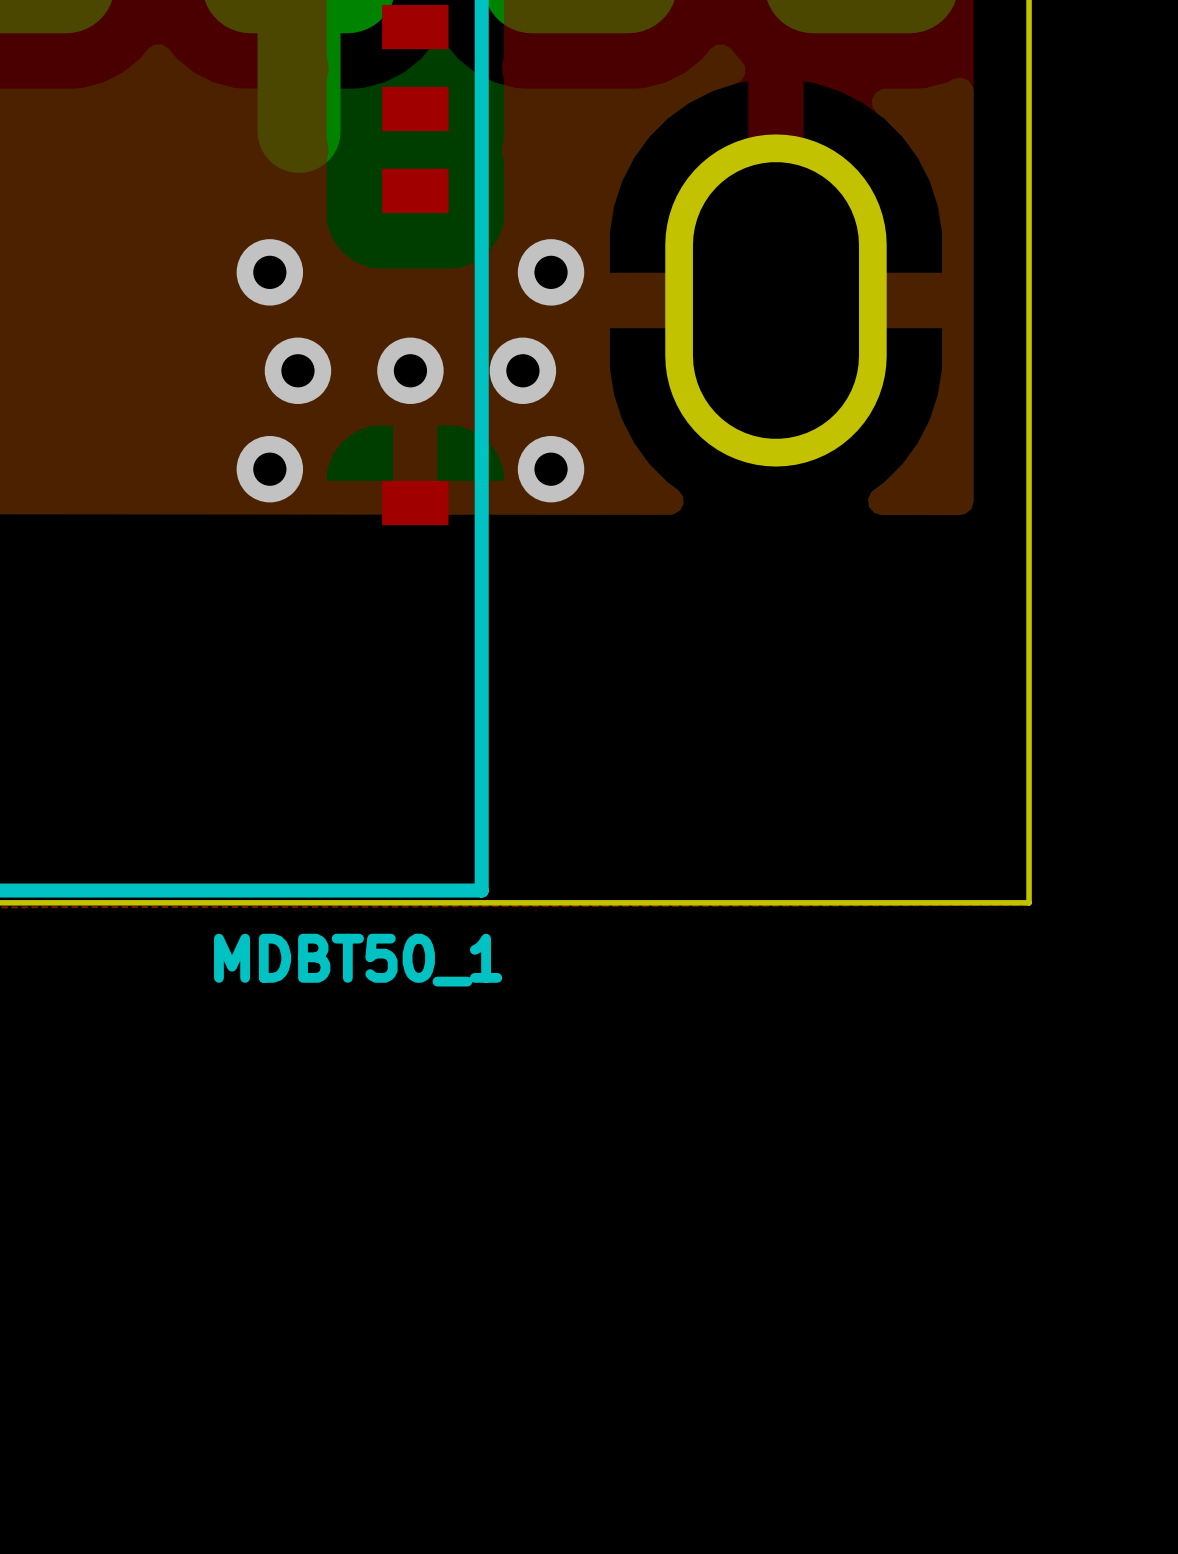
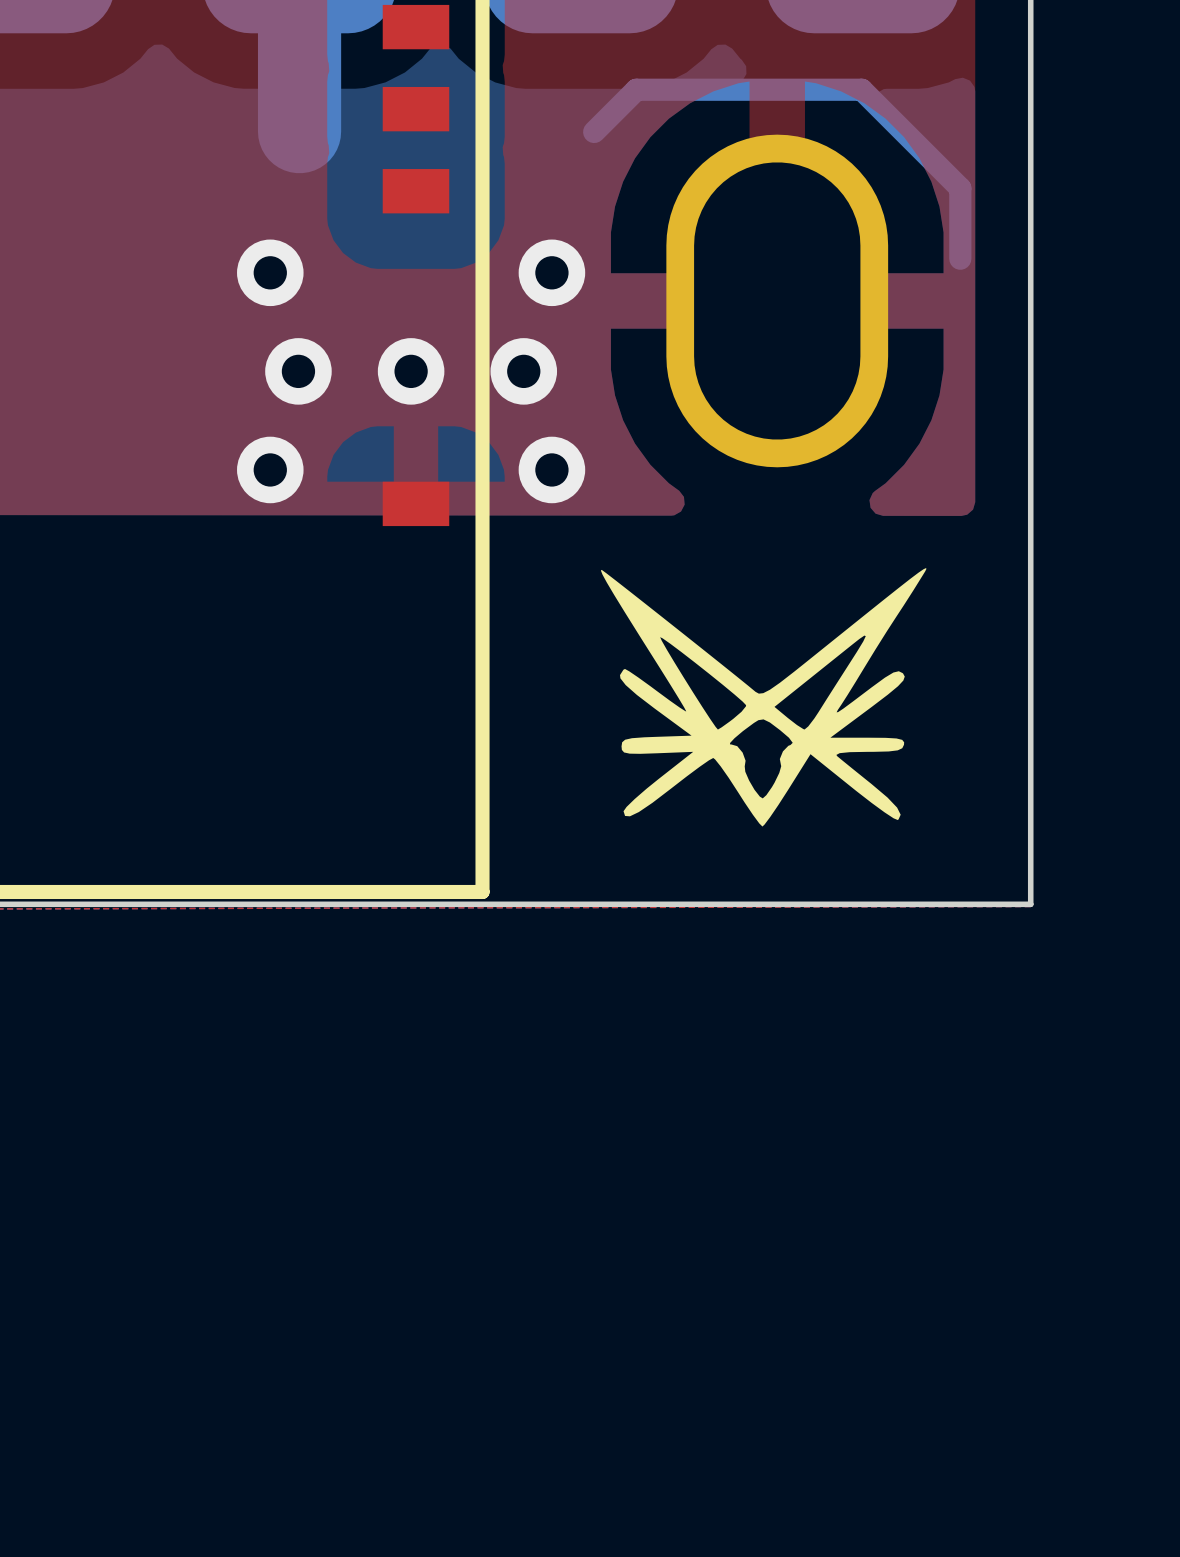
bottom track: none -> (594, 131) (636, 89) (861, 89) (960, 188) (960, 258)
drawing: none -> [600, 568, 927, 827]
MDBT50_1 name: MDBT50_1 (358, 960) -> none

